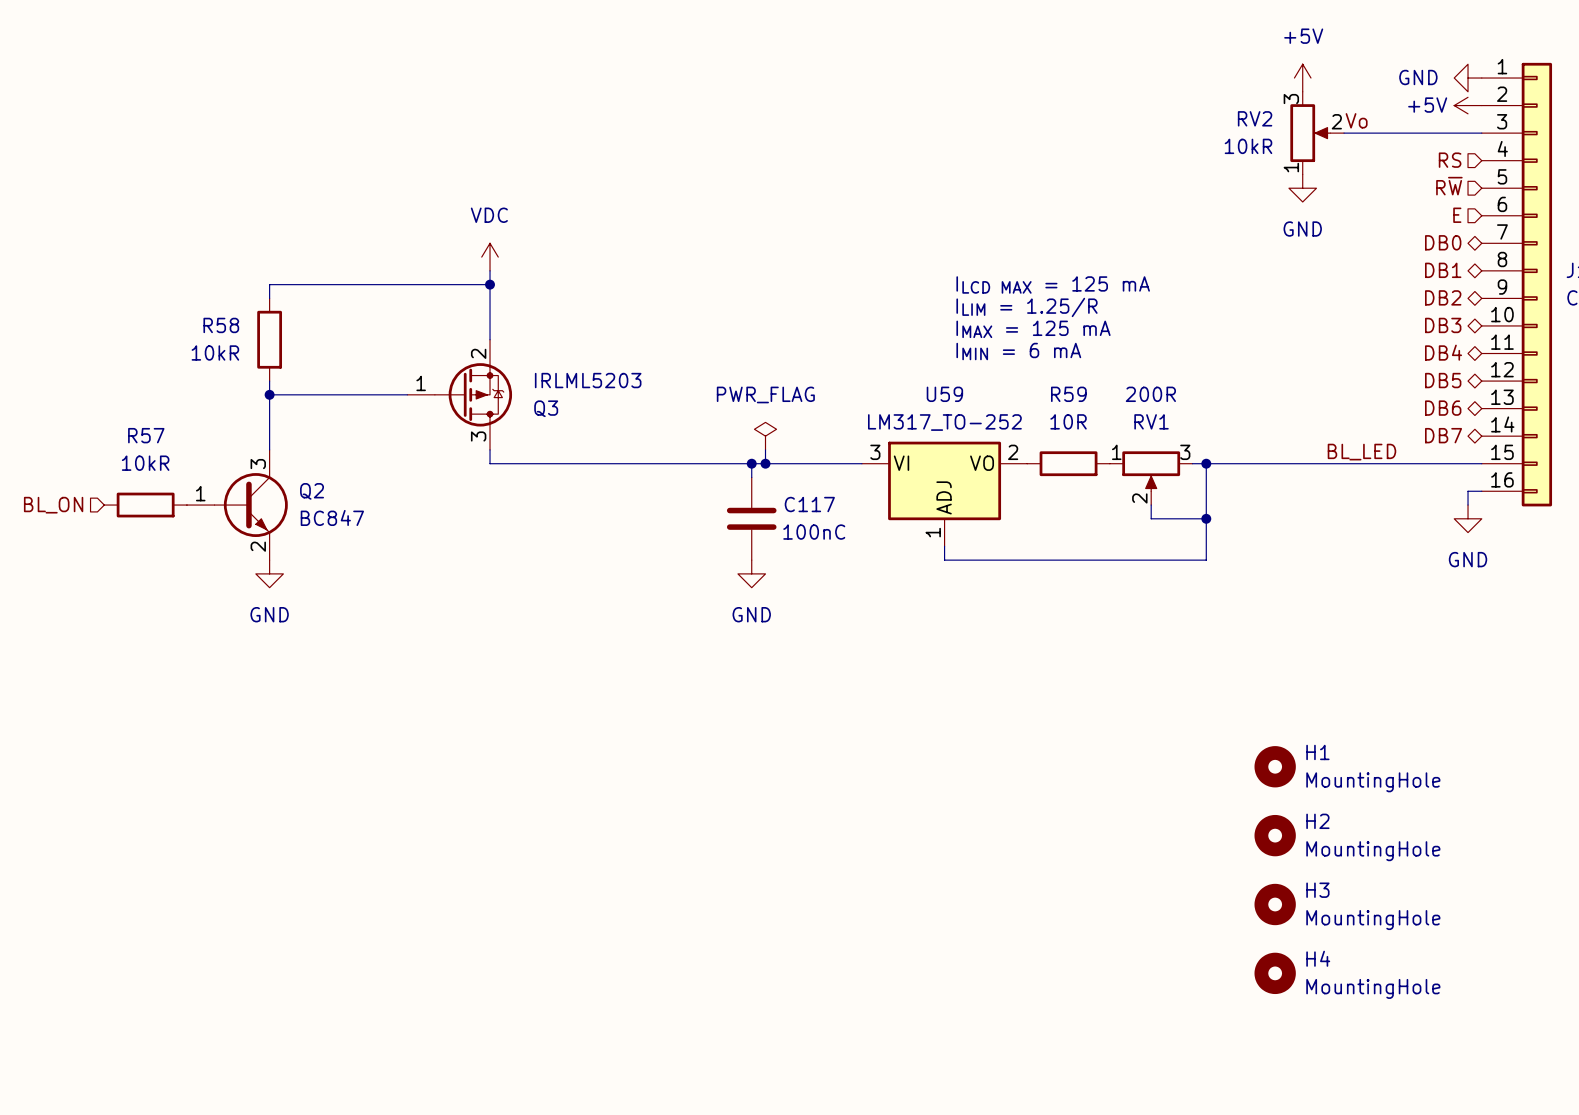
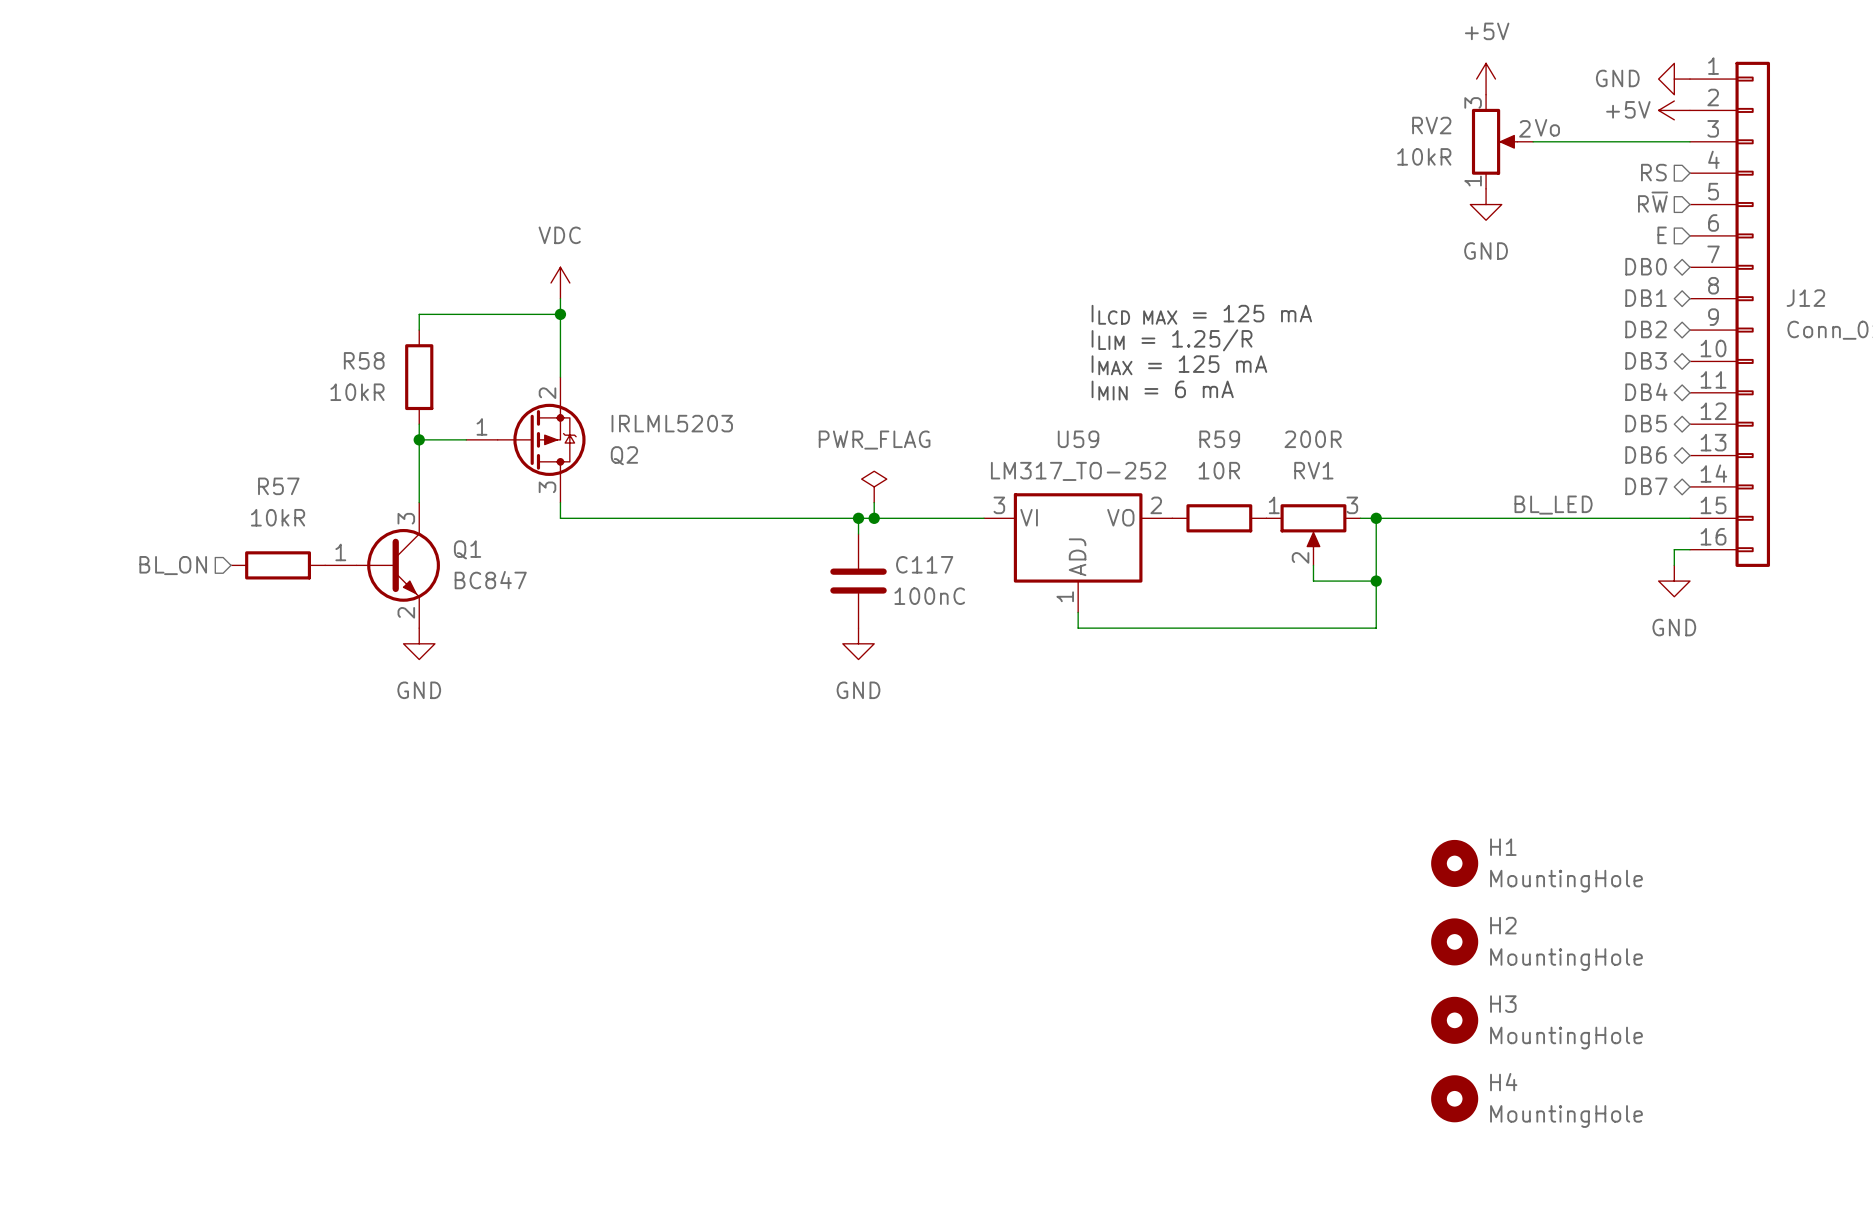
wire: (366, 284) (269, 284) (269, 298) -> (419, 314) (419, 330)
R58 position: (269, 339) -> (419, 377)
wire: (269, 381) (269, 449) -> (419, 424) (419, 502)
wire: (269, 394) (366, 394) -> none
junction: (269, 394) -> none
junction: none -> (419, 439)
Q3 name: Q3 (546, 408) -> Q2 (624, 455)
hierarchical label position: BL_ON (53, 505) -> BL_ON (173, 565)
R57 position: (145, 505) -> (278, 565)
Q2: BC847 (237, 505) -> none
Q1: none -> BC847 (382, 565)
power symbol position: GND (269, 573) -> GND (419, 643)

